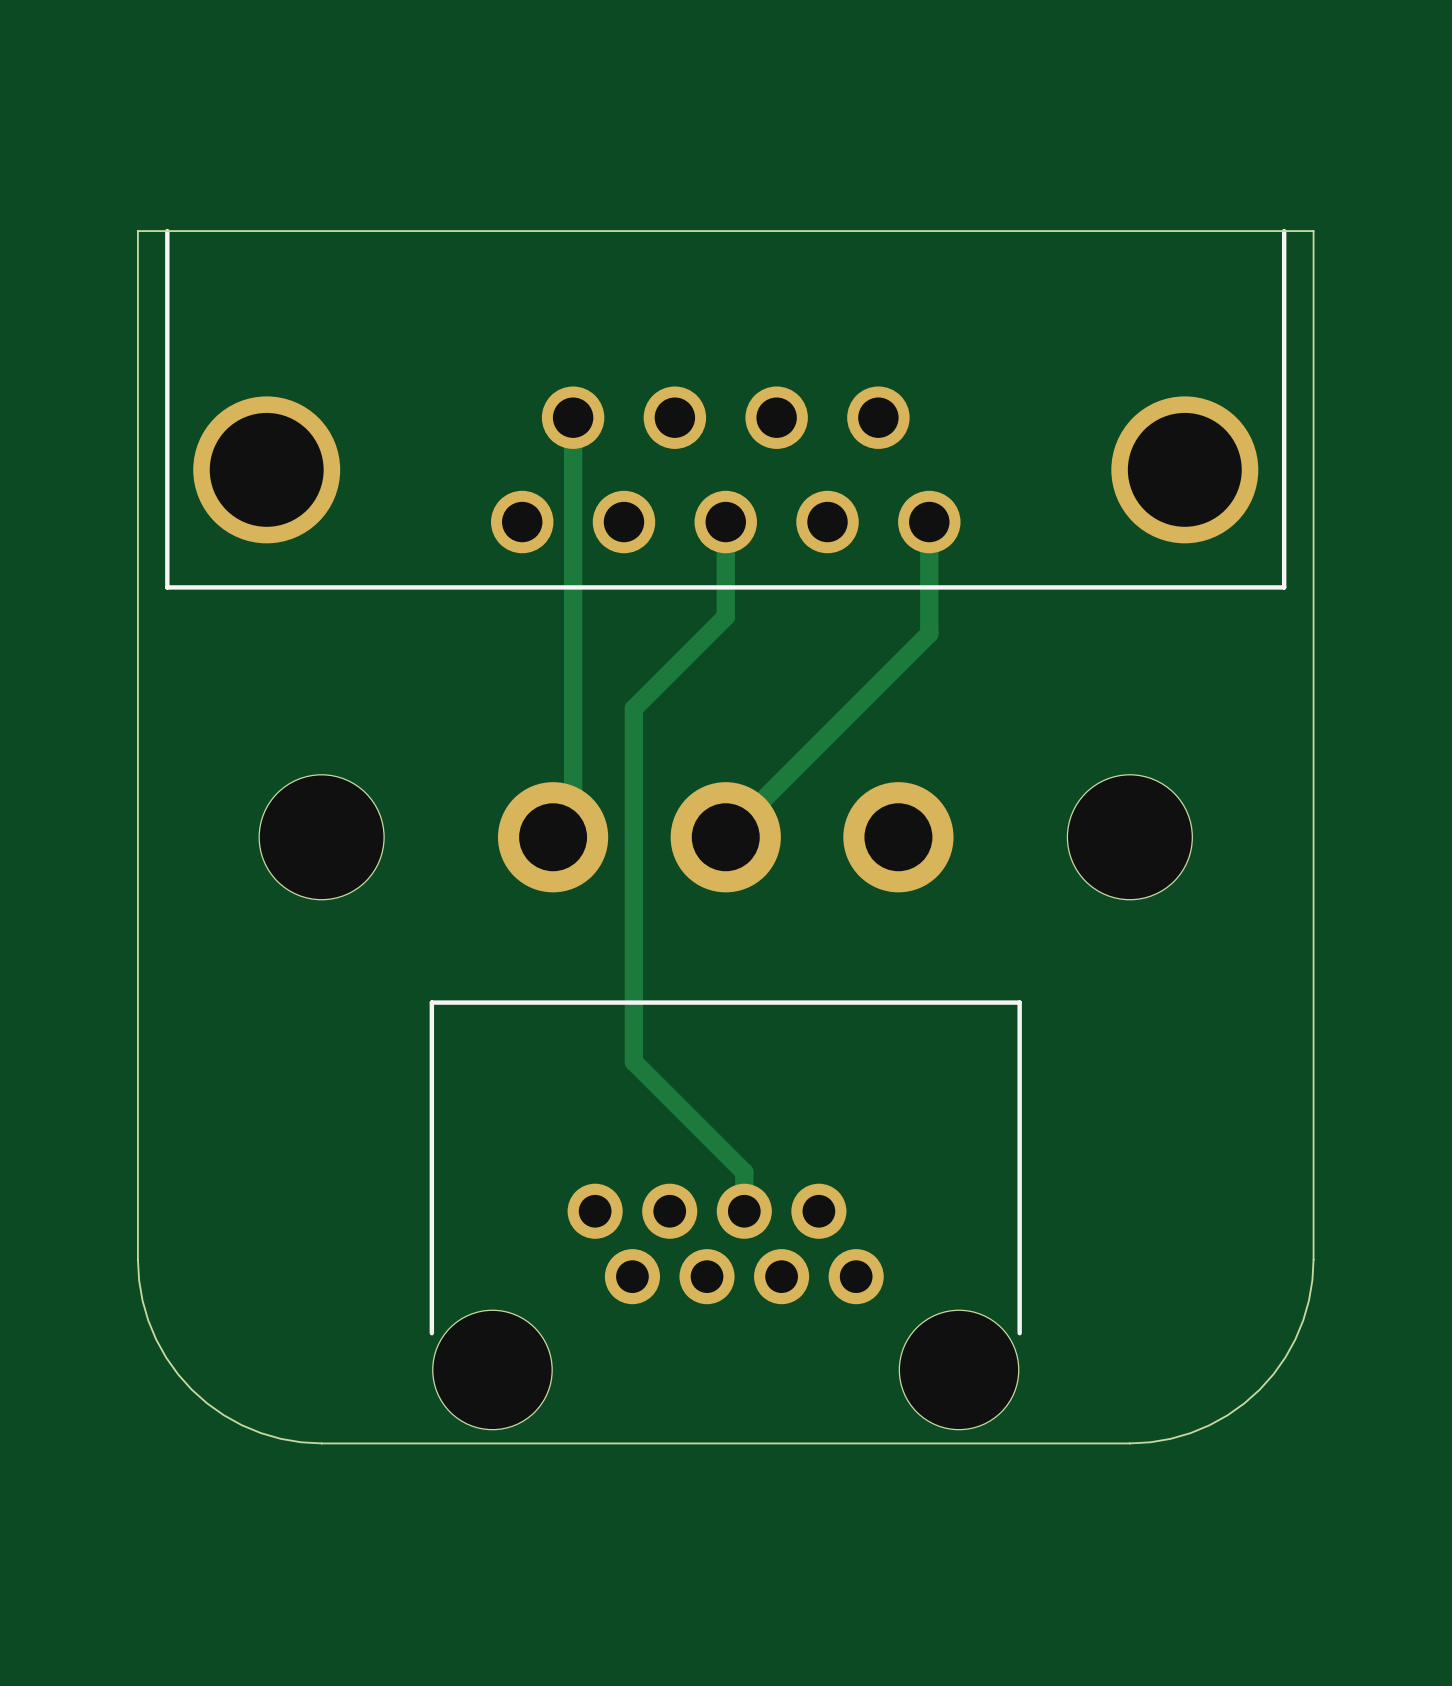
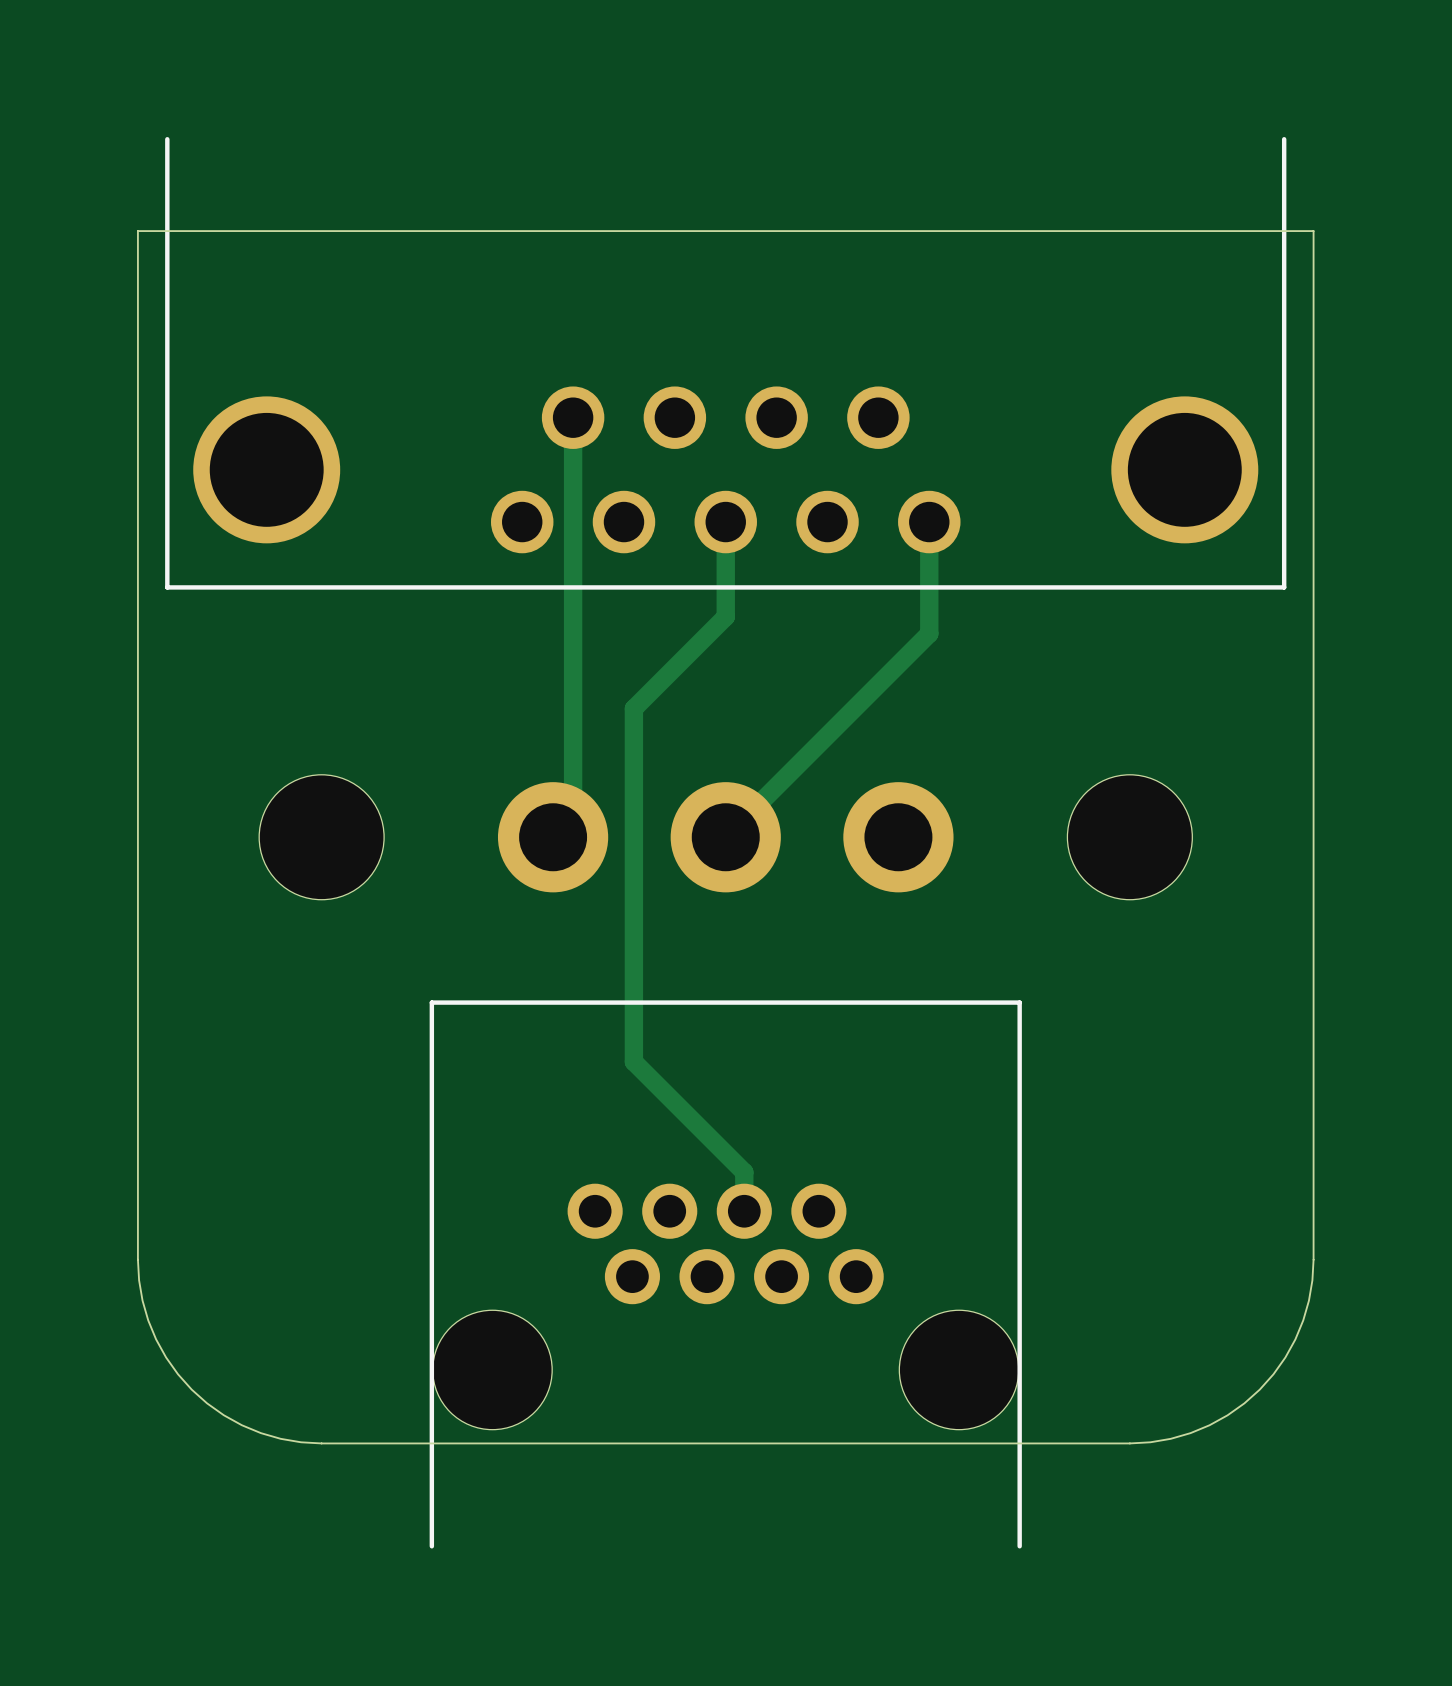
part: none -> (725, 363)
part: (725, 409) -> none
part: (725, 1215) -> none
part: none -> (725, 1274)

